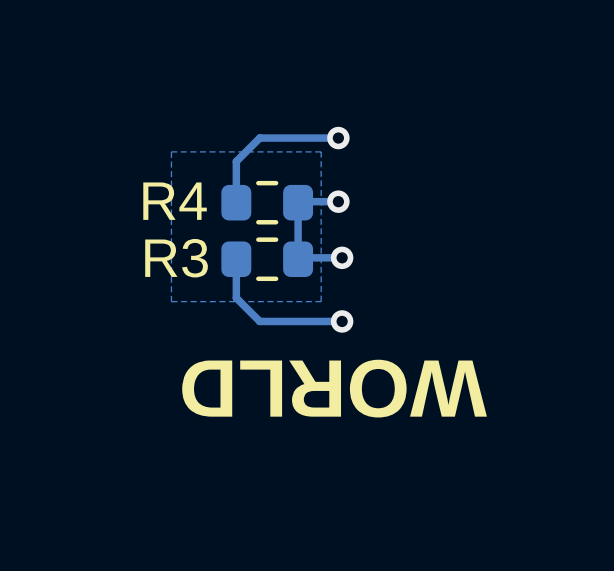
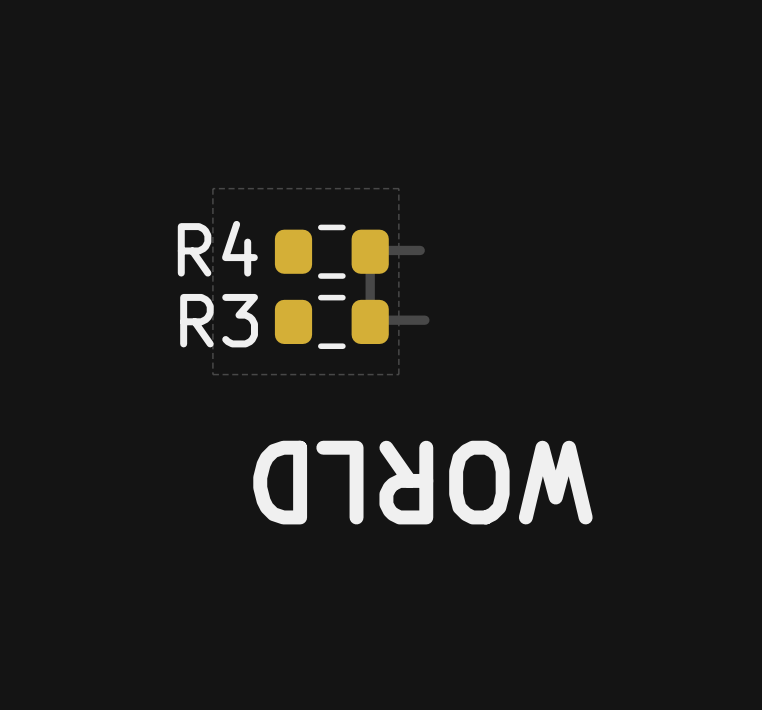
track: (338, 138) (259, 138) (236, 161) (236, 202) -> none
via: (338, 138) -> none
via: (338, 201) -> none
via: (342, 257) -> none
track: (236, 259) (236, 298) (259, 321) (342, 321) -> none
via: (342, 321) -> none

